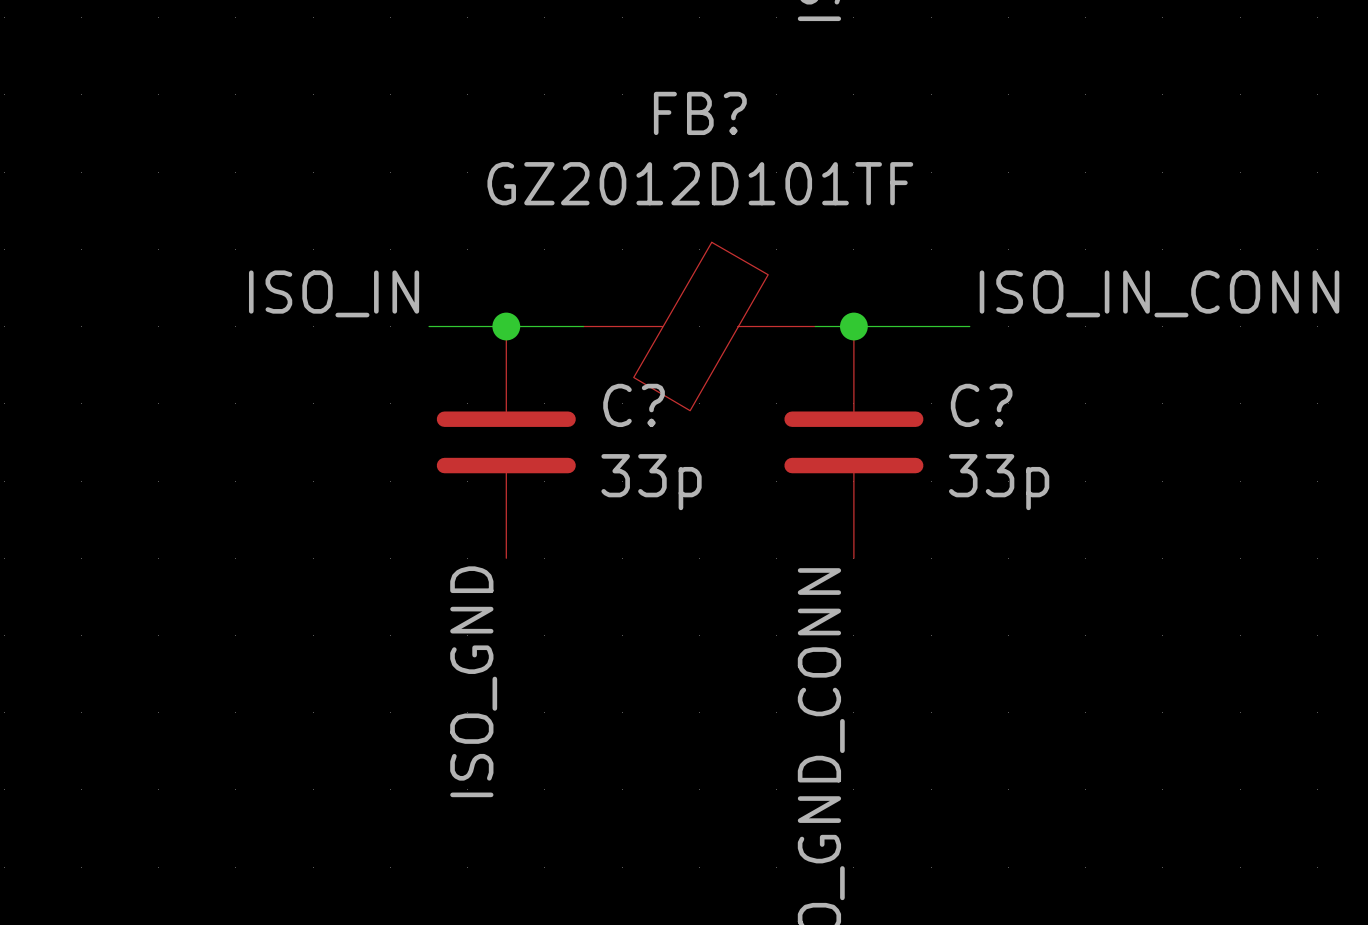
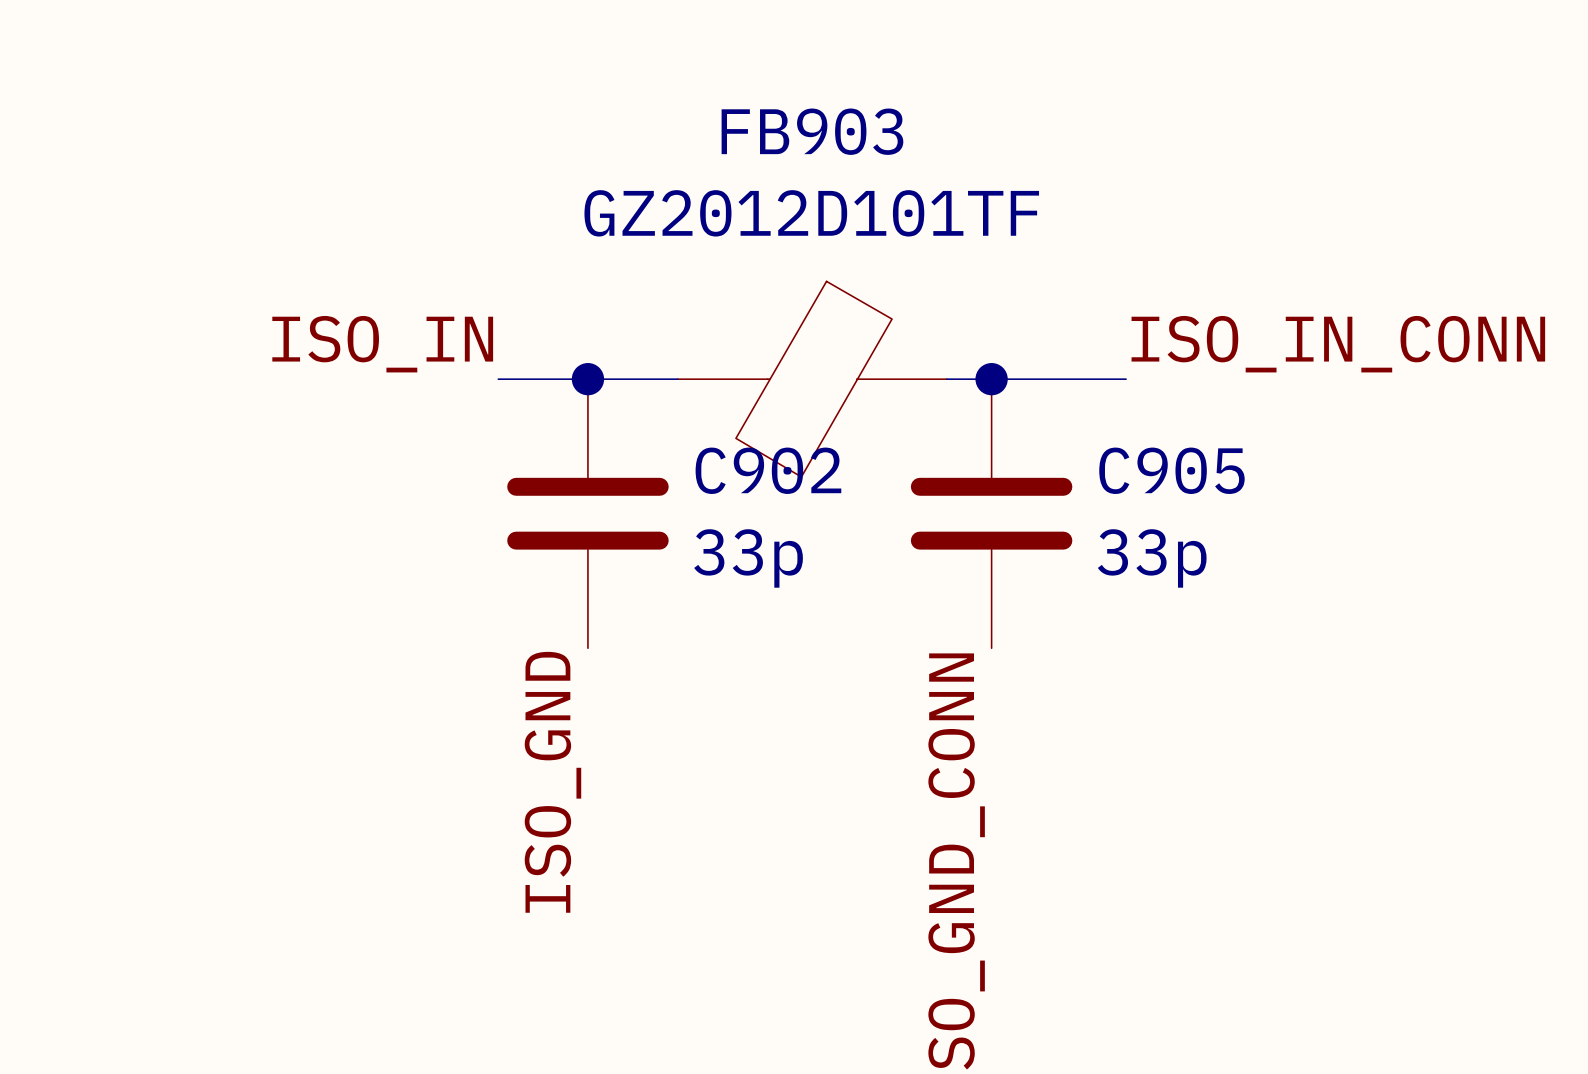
FB? name: FB? (700, 113) -> FB903 (812, 131)
C? name: C? (634, 405) -> C902 (768, 470)
C? name: C? (981, 405) -> C905 (1171, 470)

